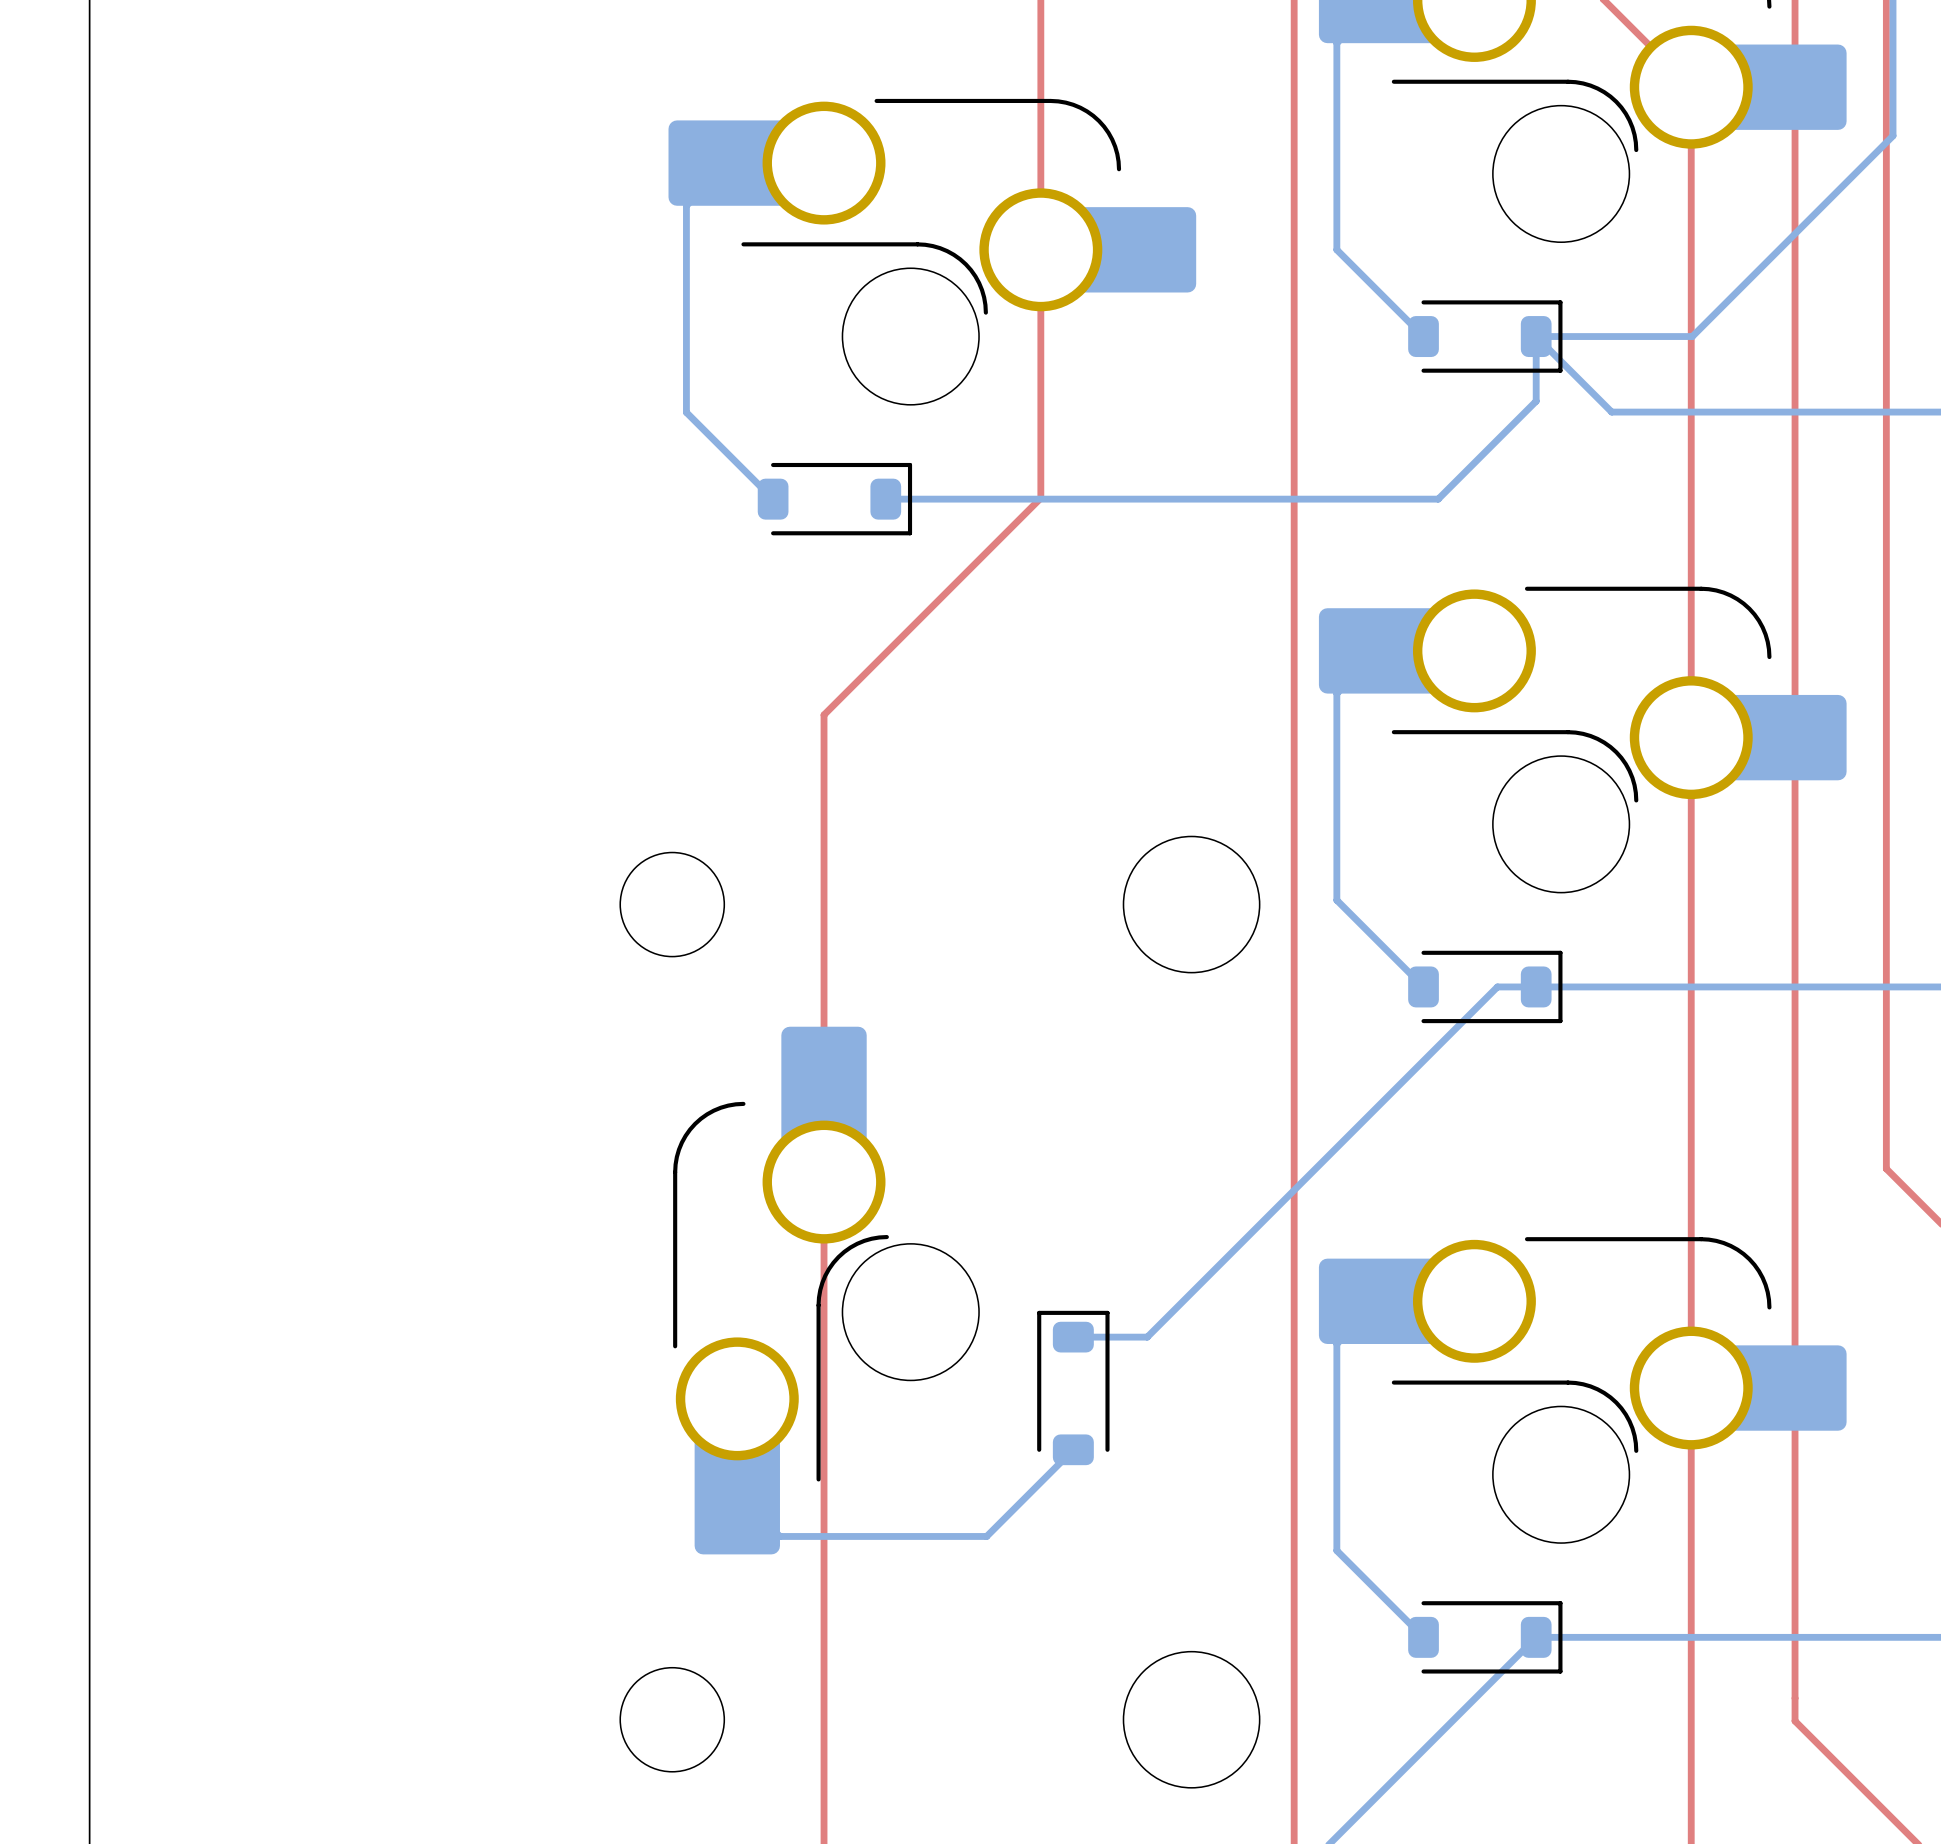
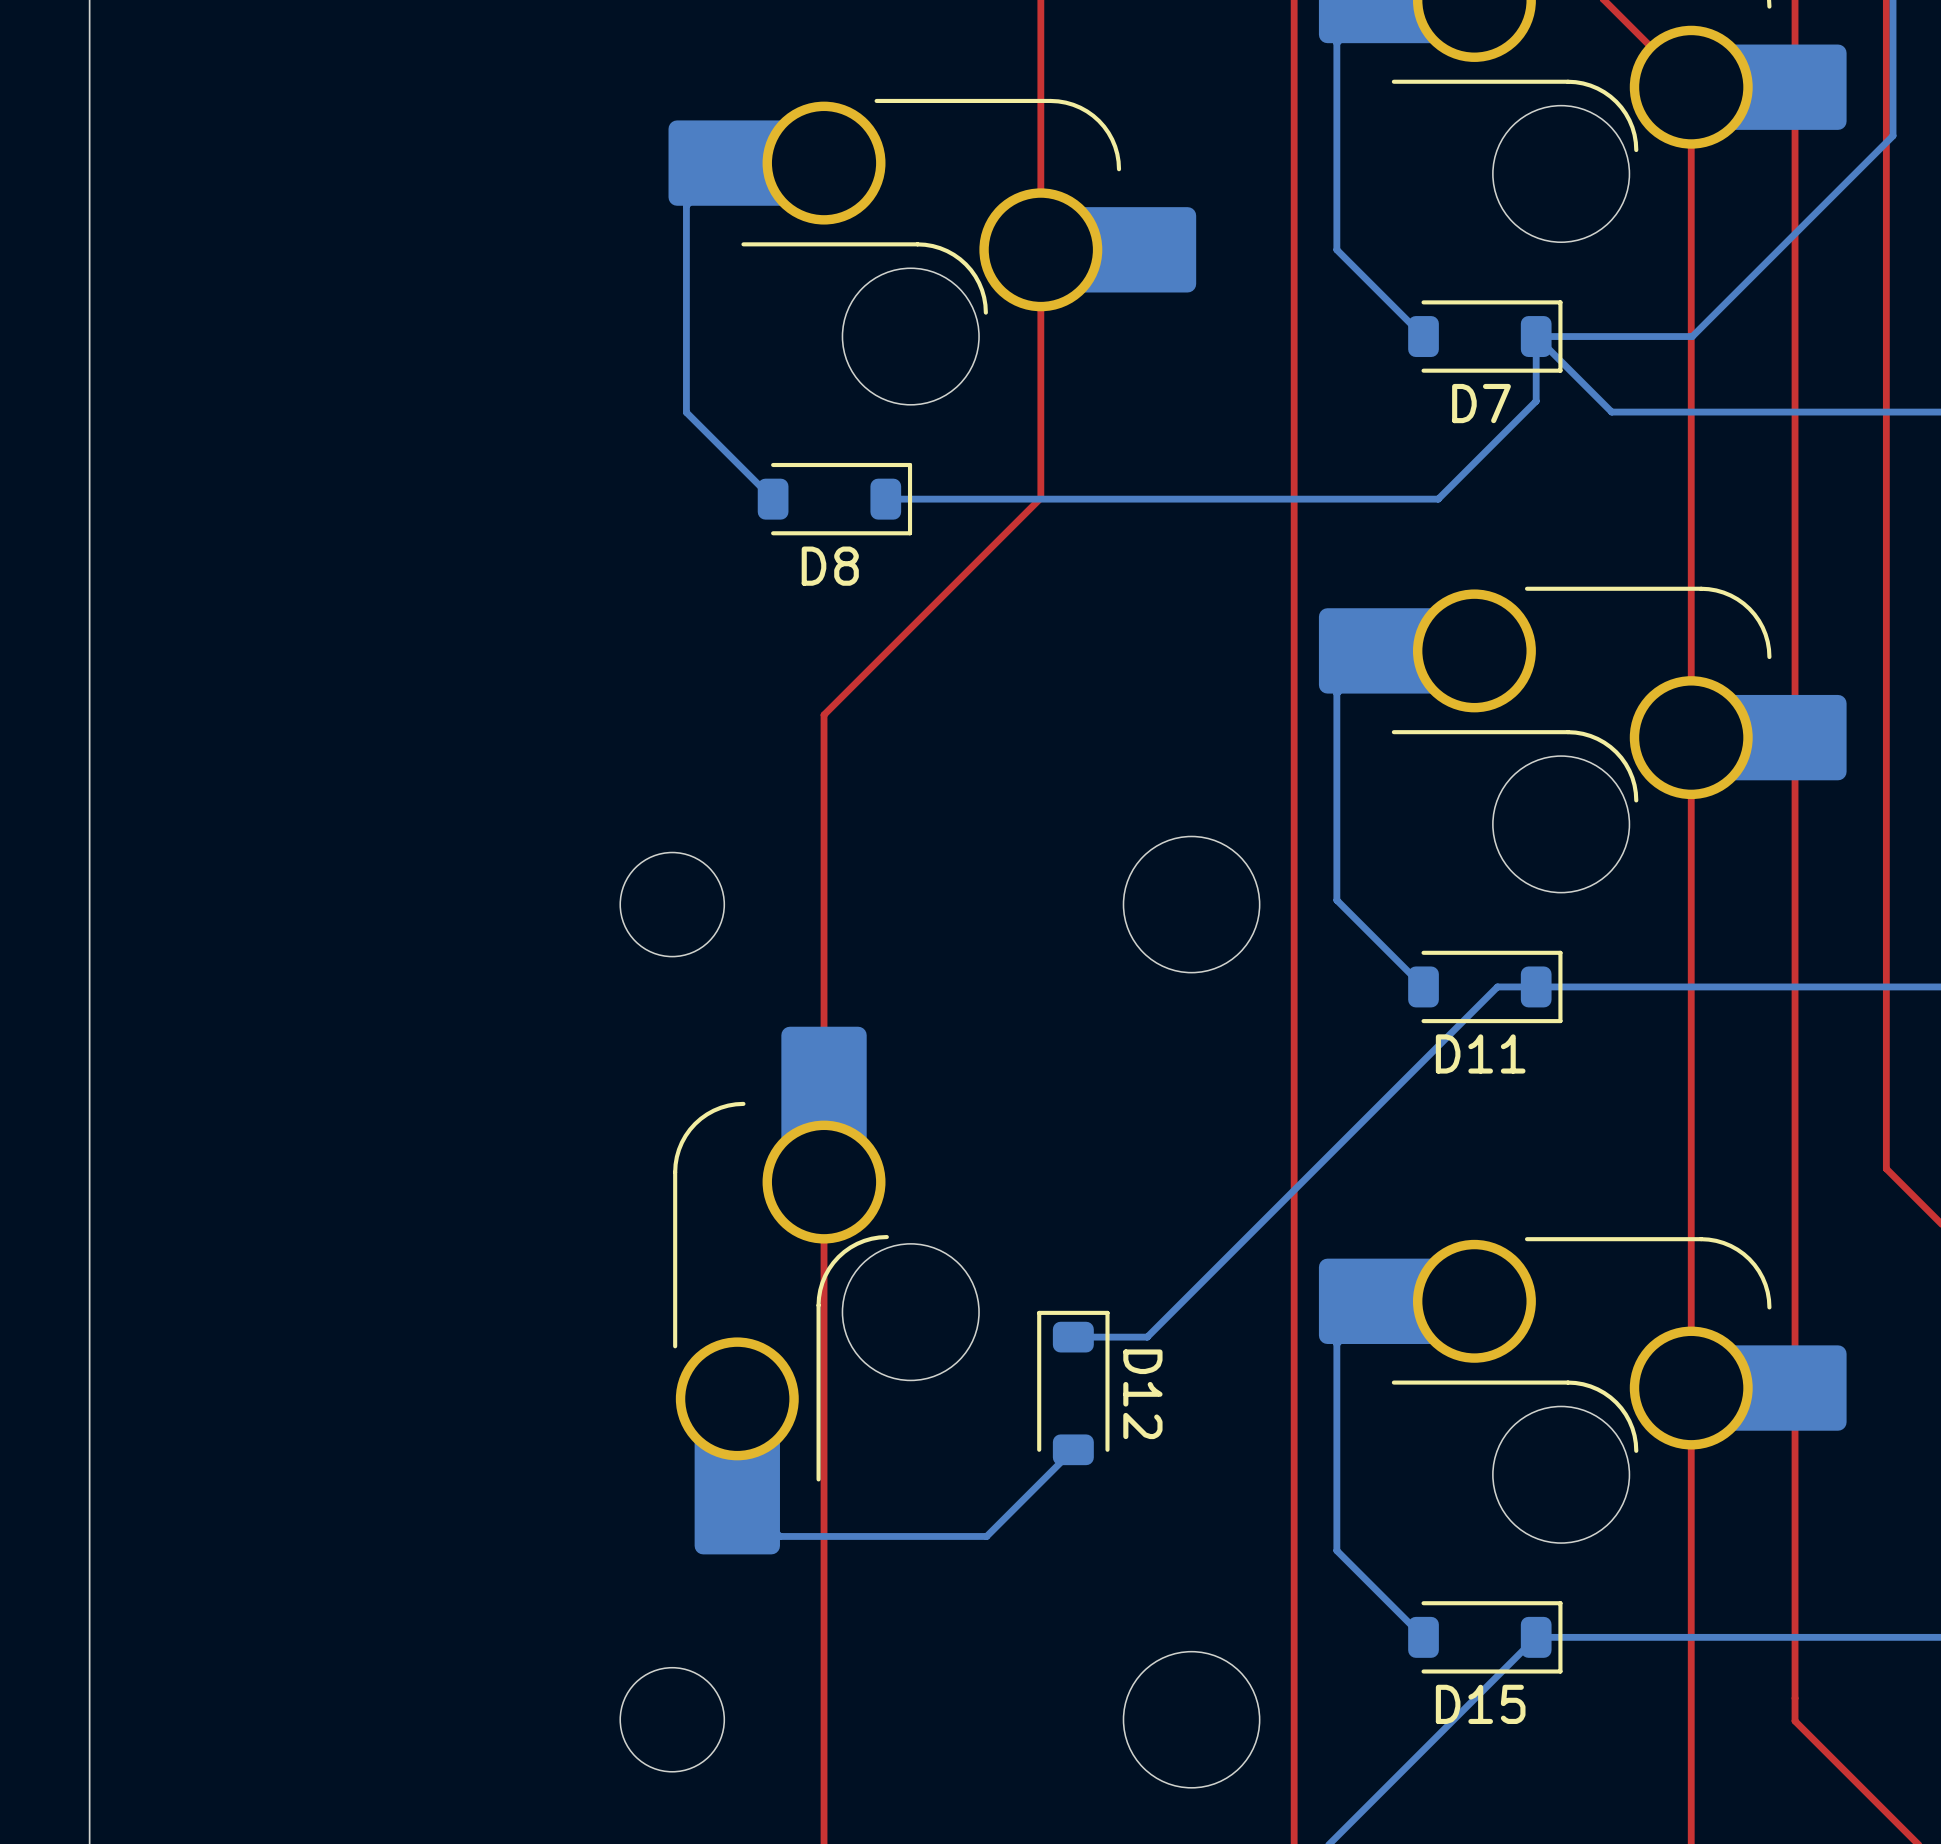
D7 name: none -> D7 (1481, 403)
D8 name: none -> D8 (830, 566)
D11 name: none -> D11 (1480, 1053)
D12 name: none -> D12 (1142, 1394)
D15 name: none -> D15 (1480, 1704)

